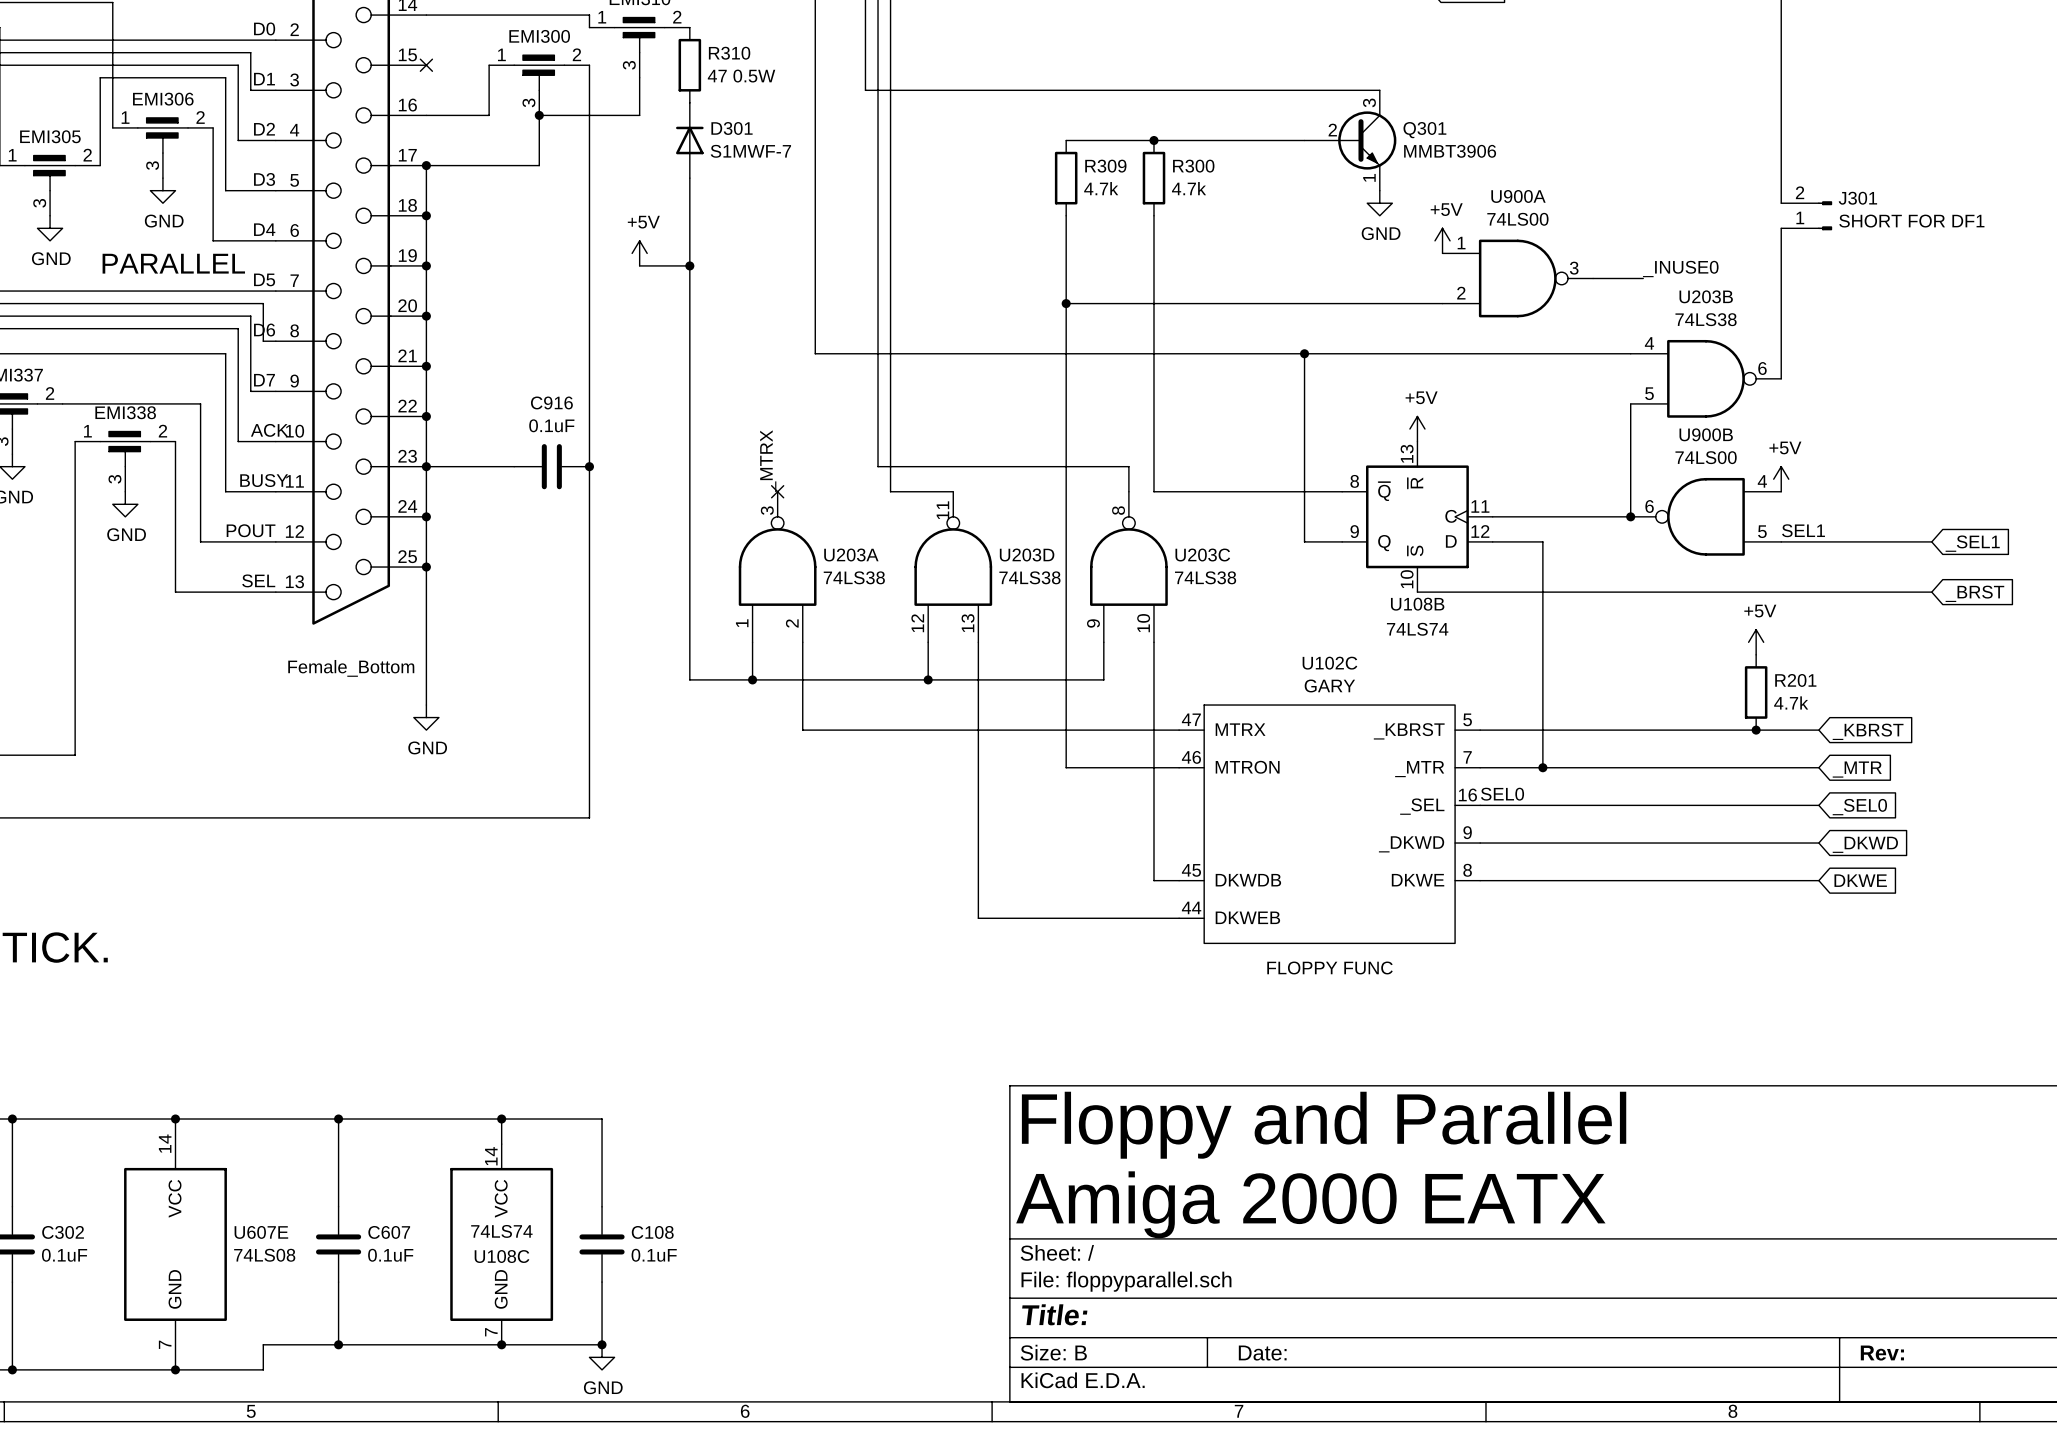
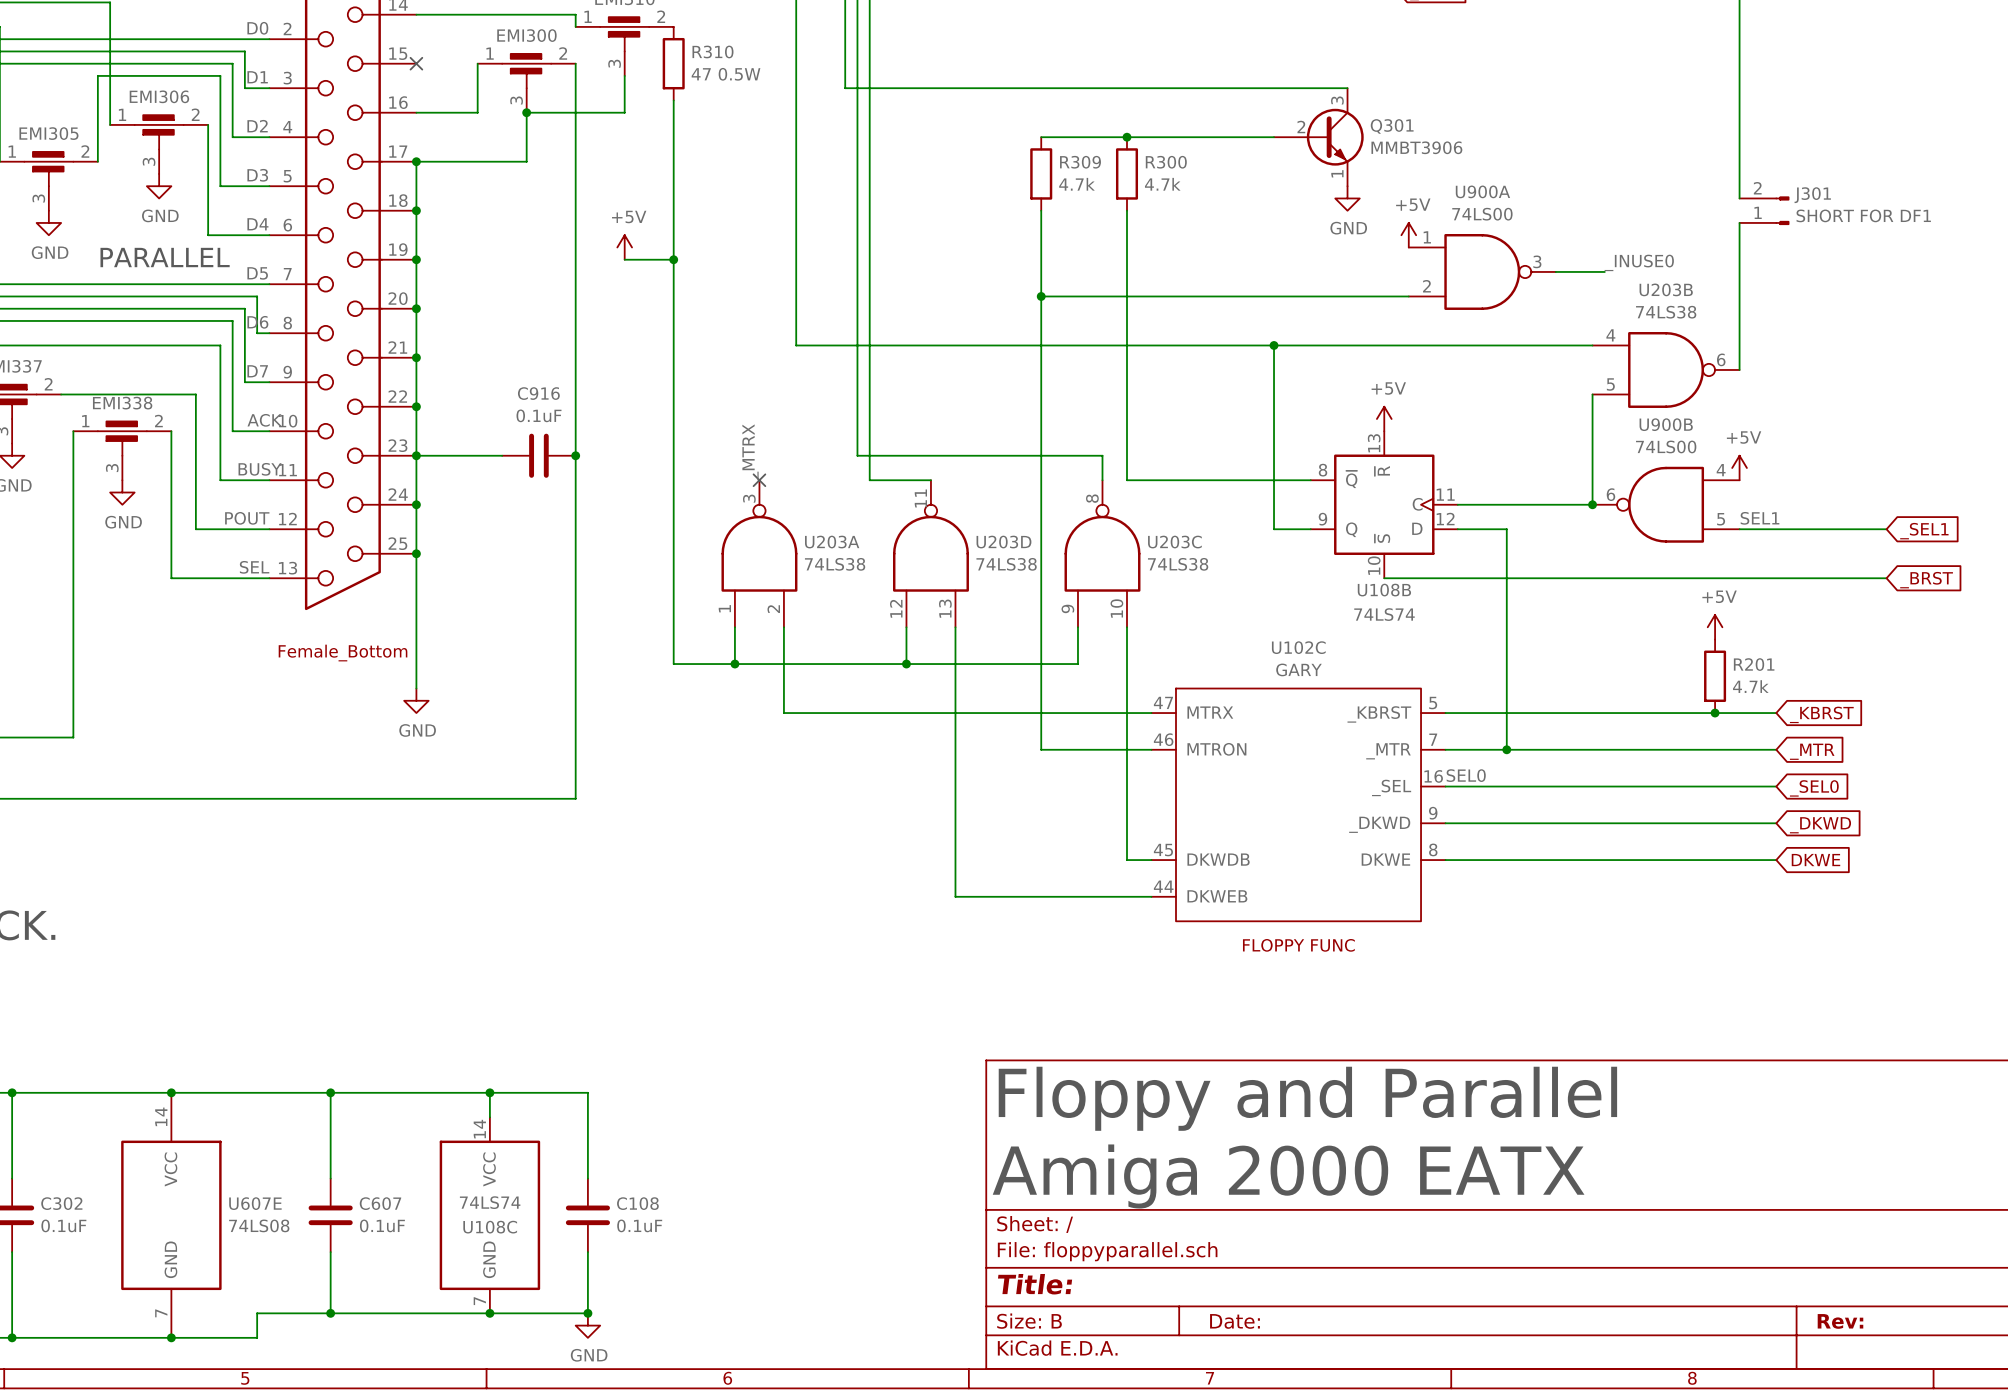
D301: S1MWF-7 (689, 140) -> none

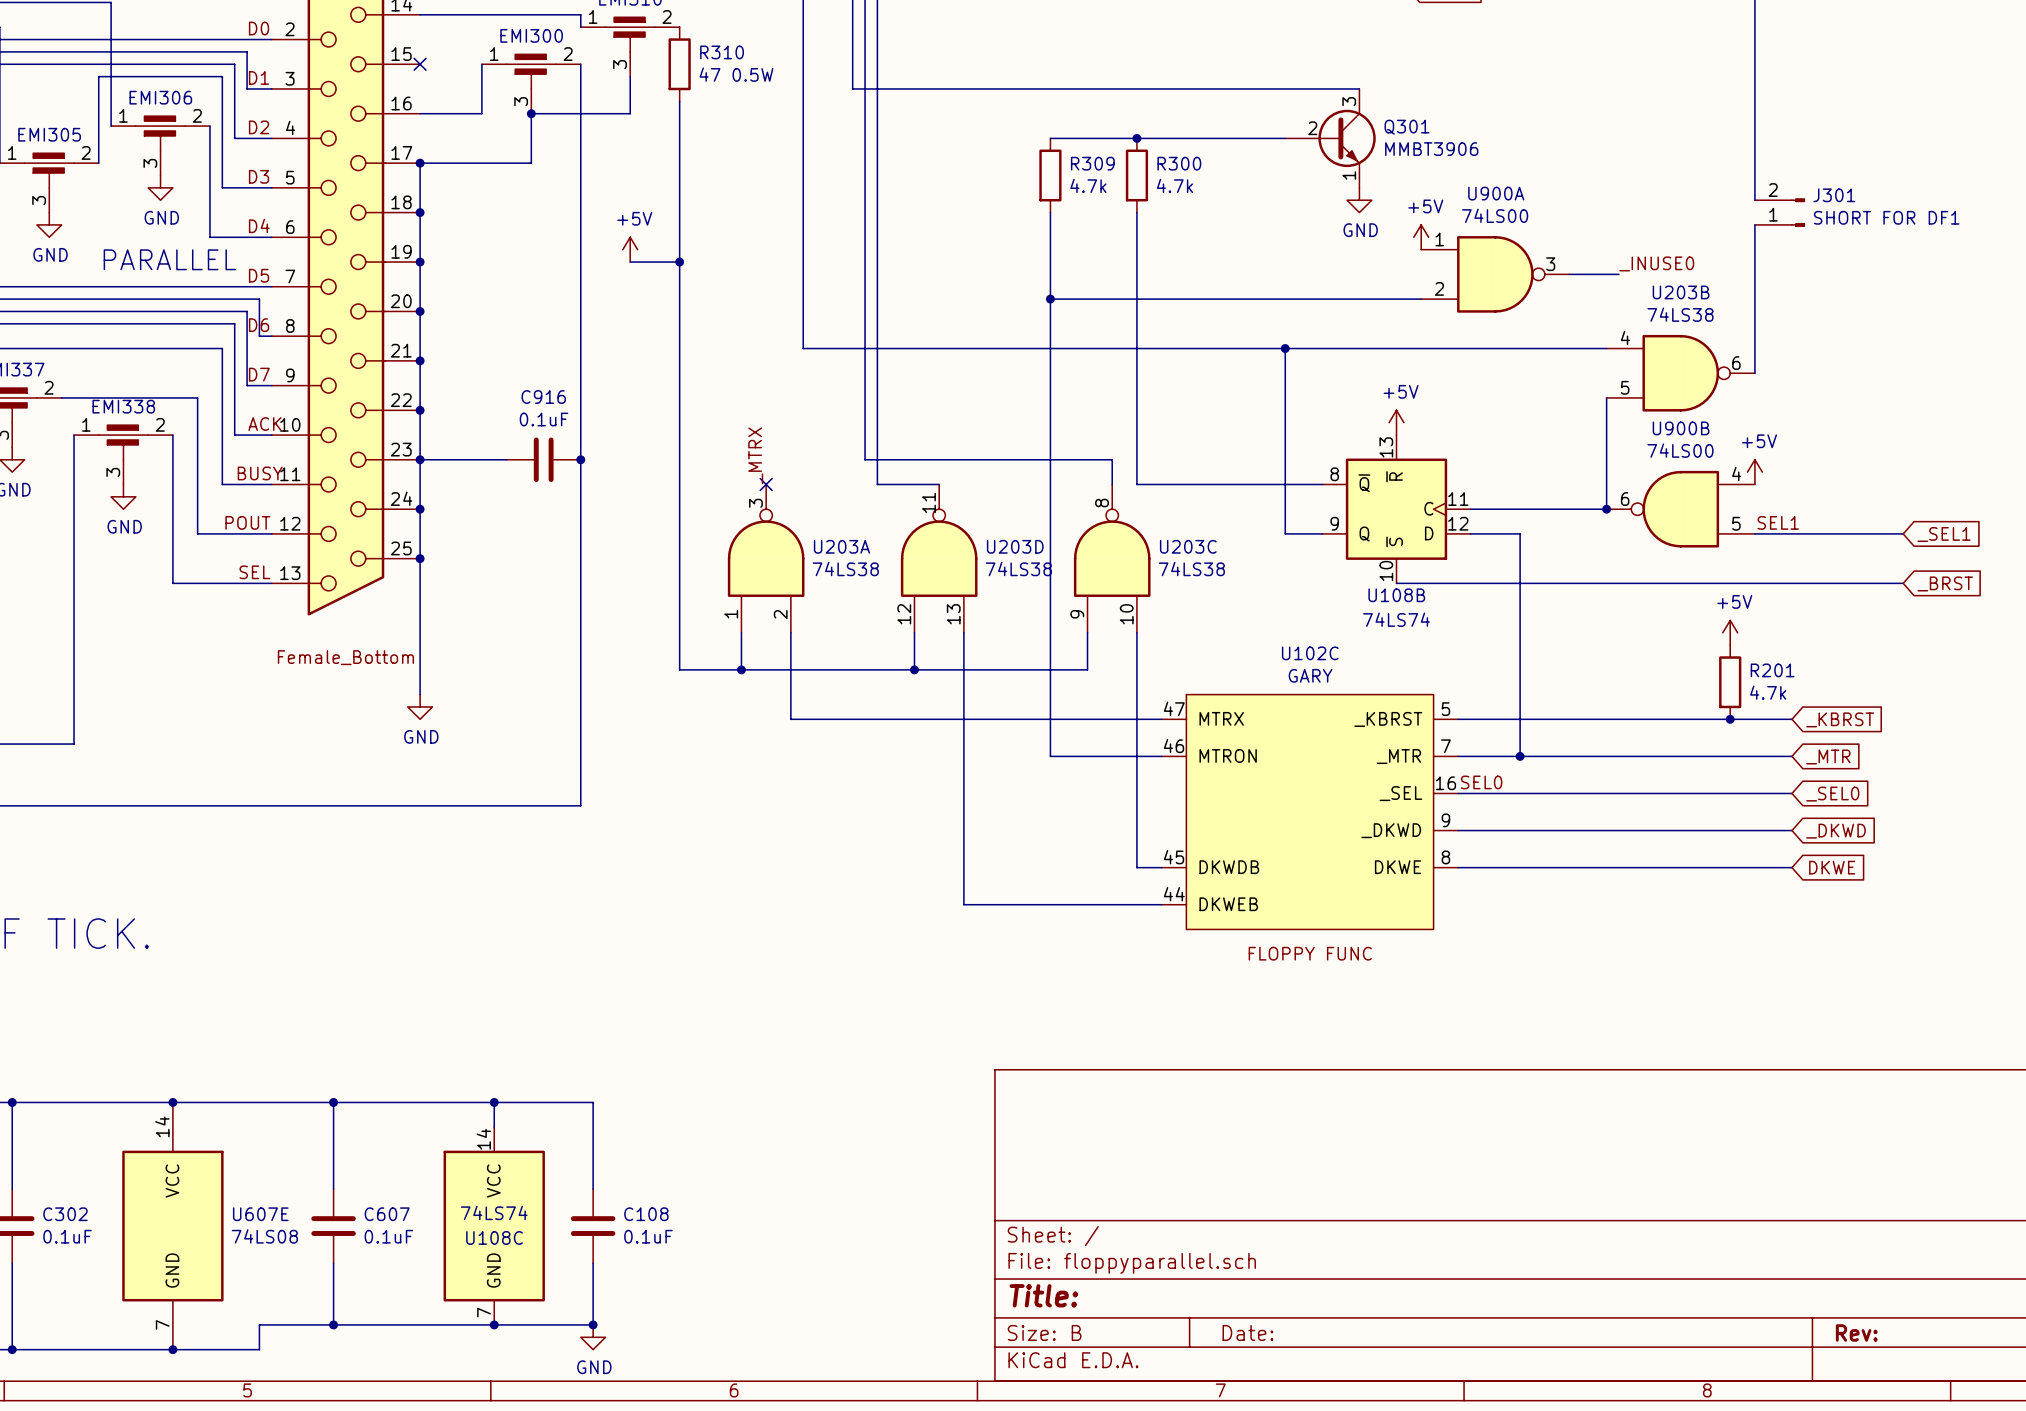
text: Floppy and Parallel (1307, 1098) -> none
text: Amiga 2000 EATX (1288, 1176) -> none

